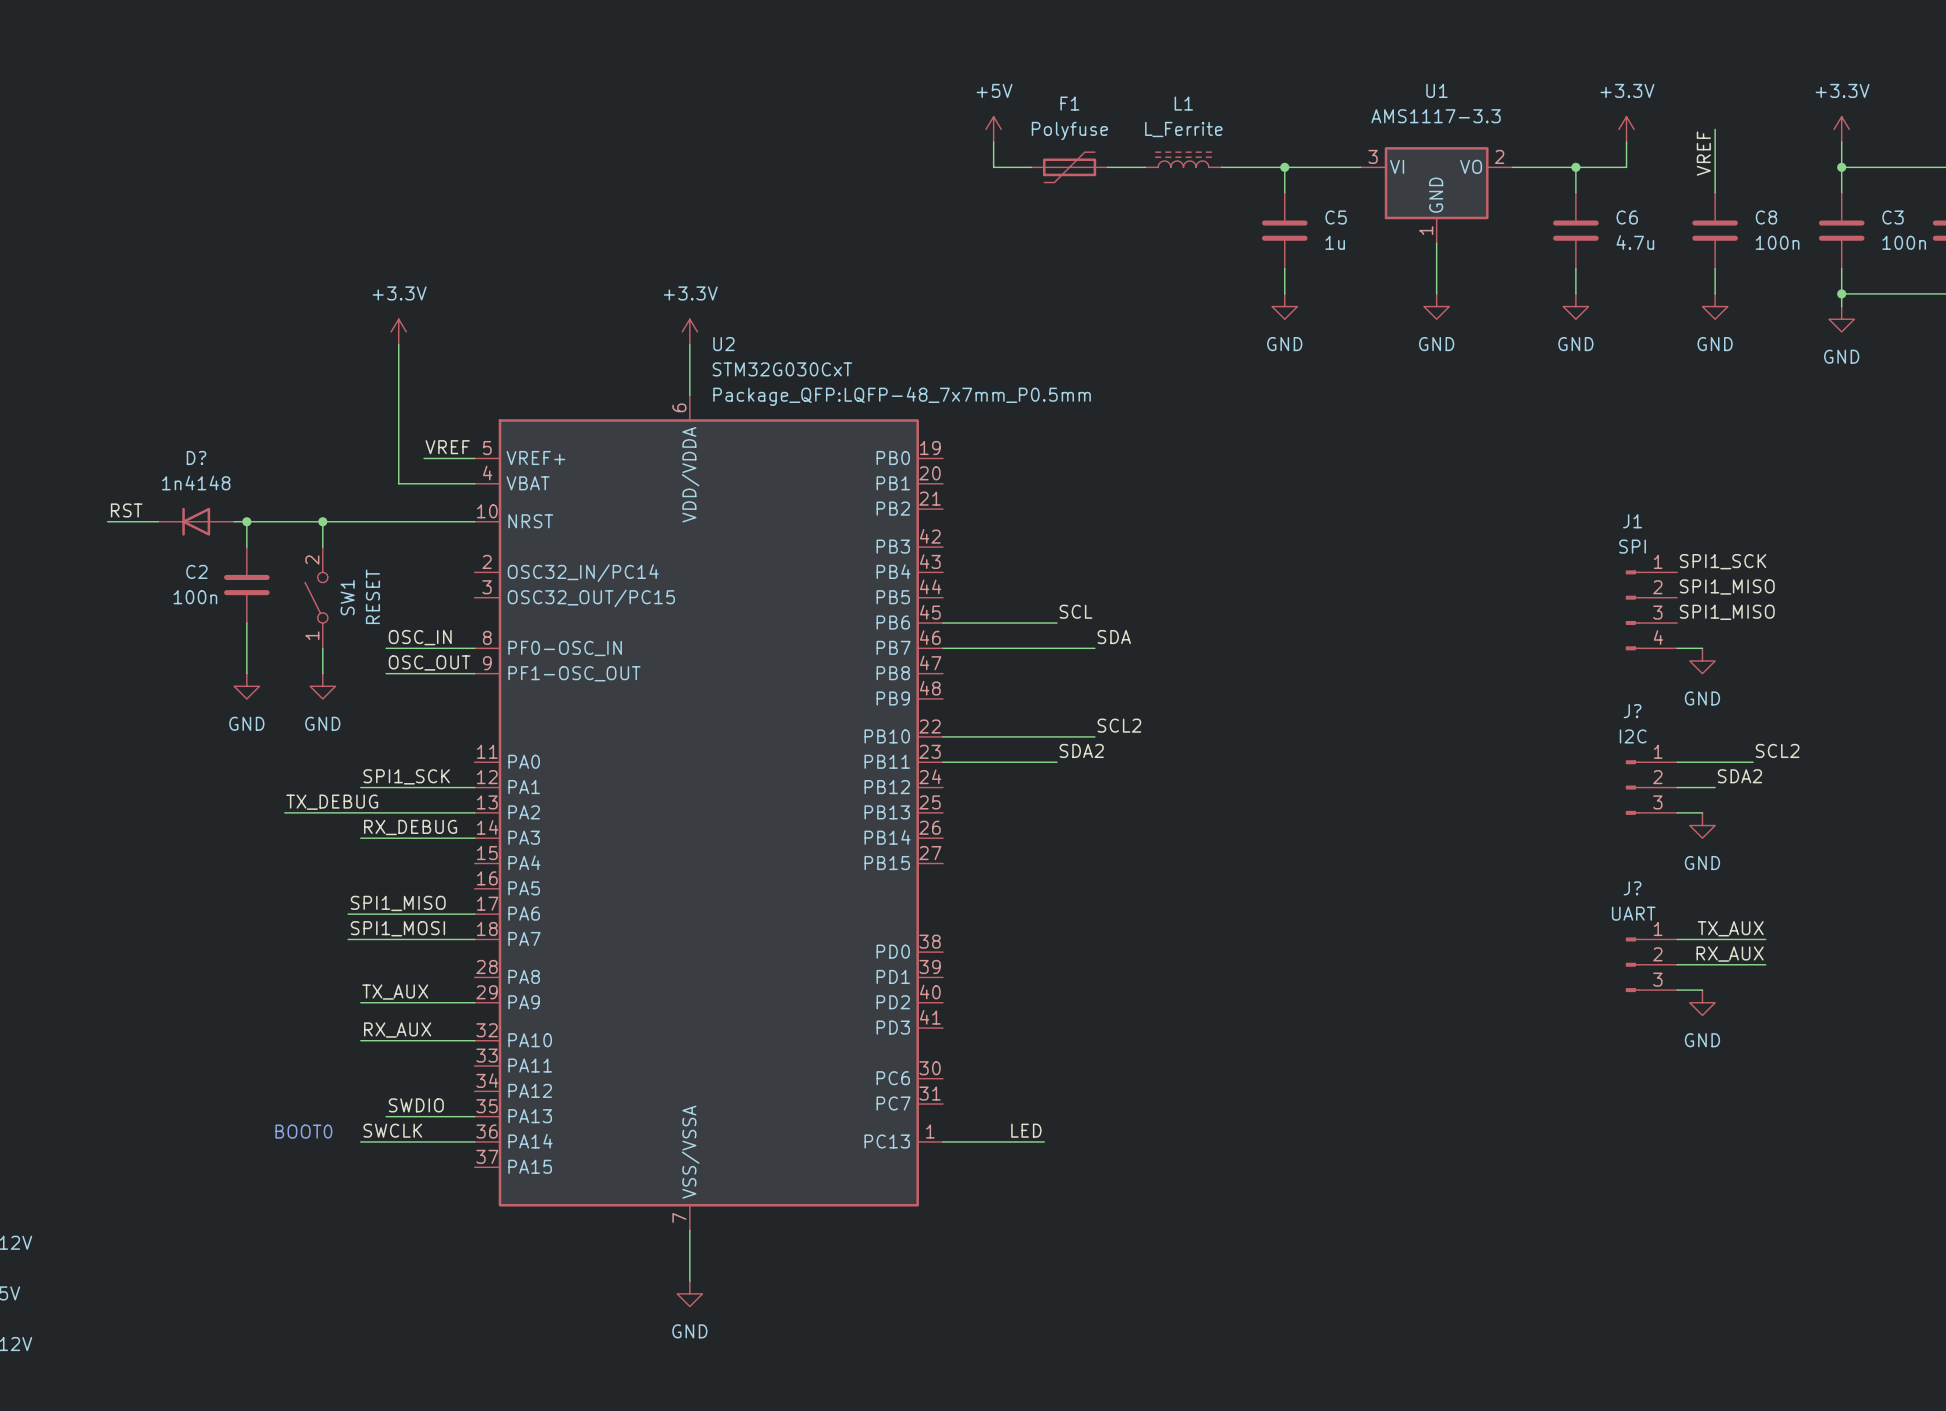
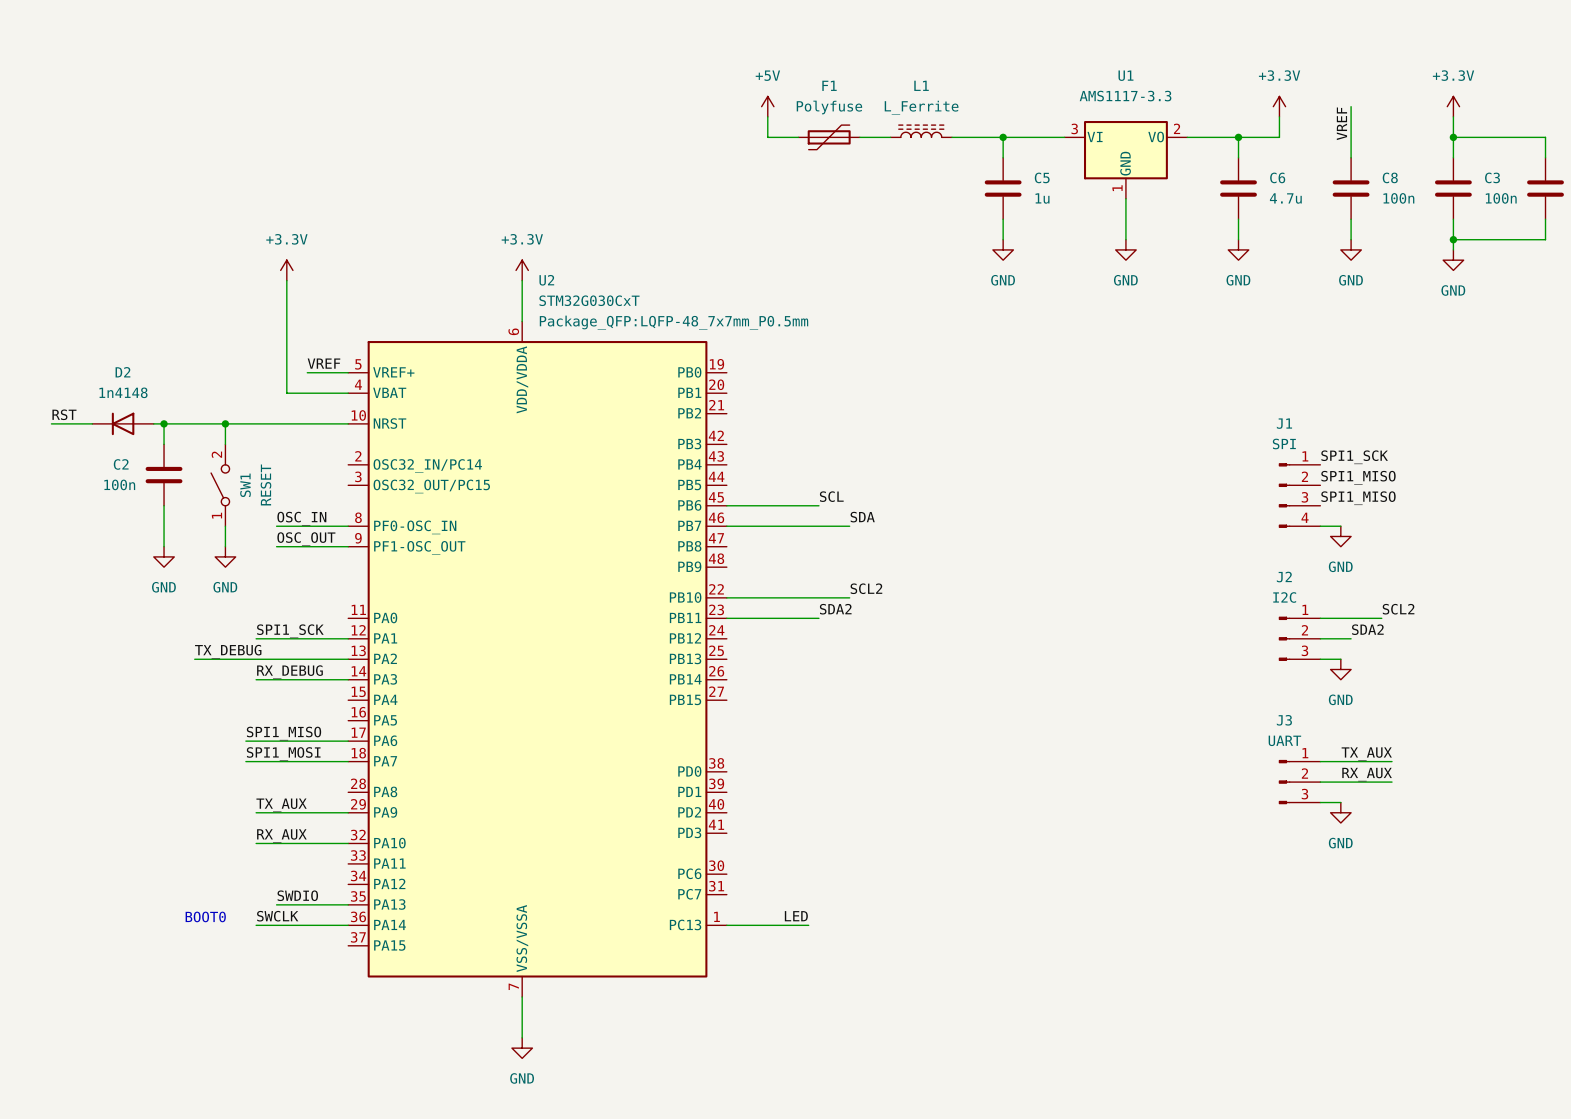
D? name: D? (196, 457) -> D2 (122, 372)
J? name: J? (1632, 711) -> J2 (1284, 577)
J? name: J? (1632, 888) -> J3 (1284, 720)

